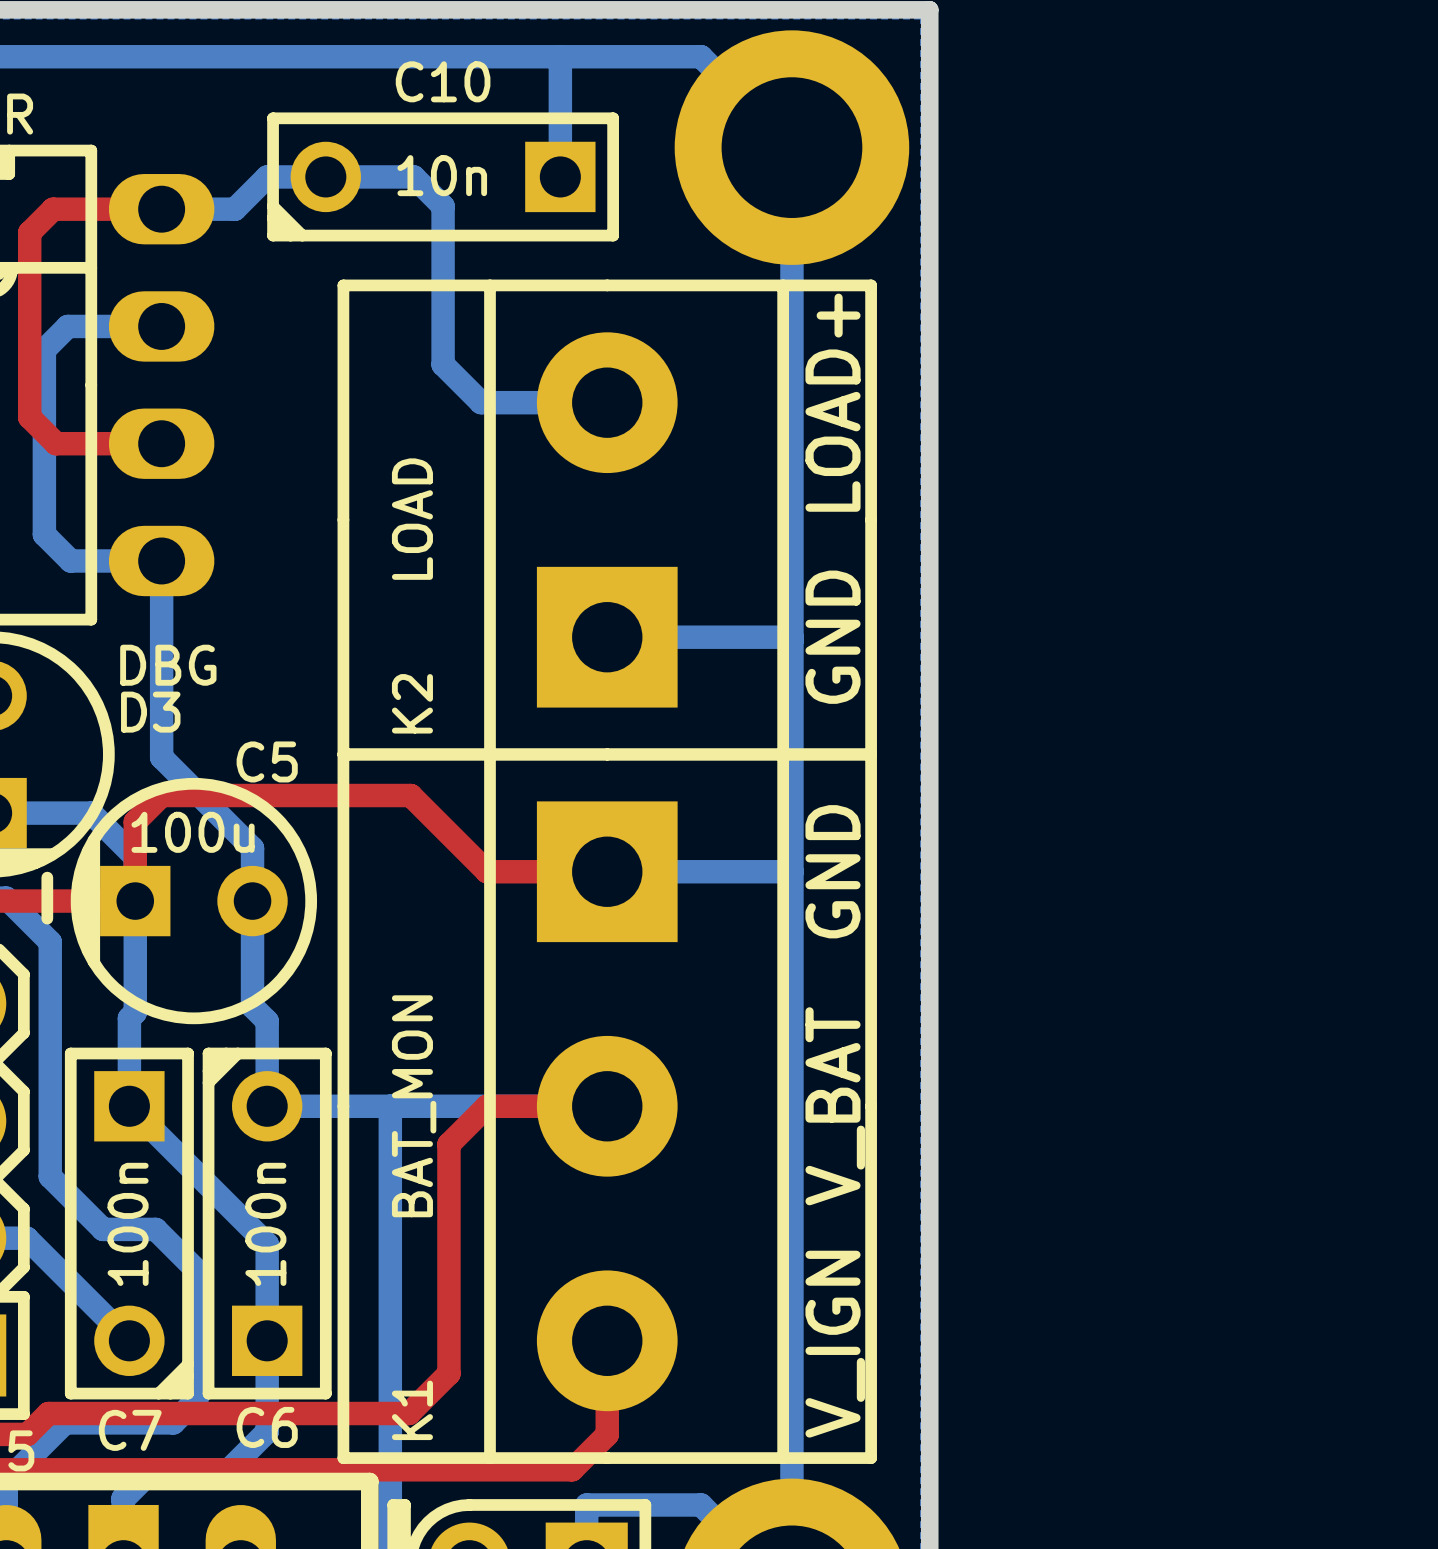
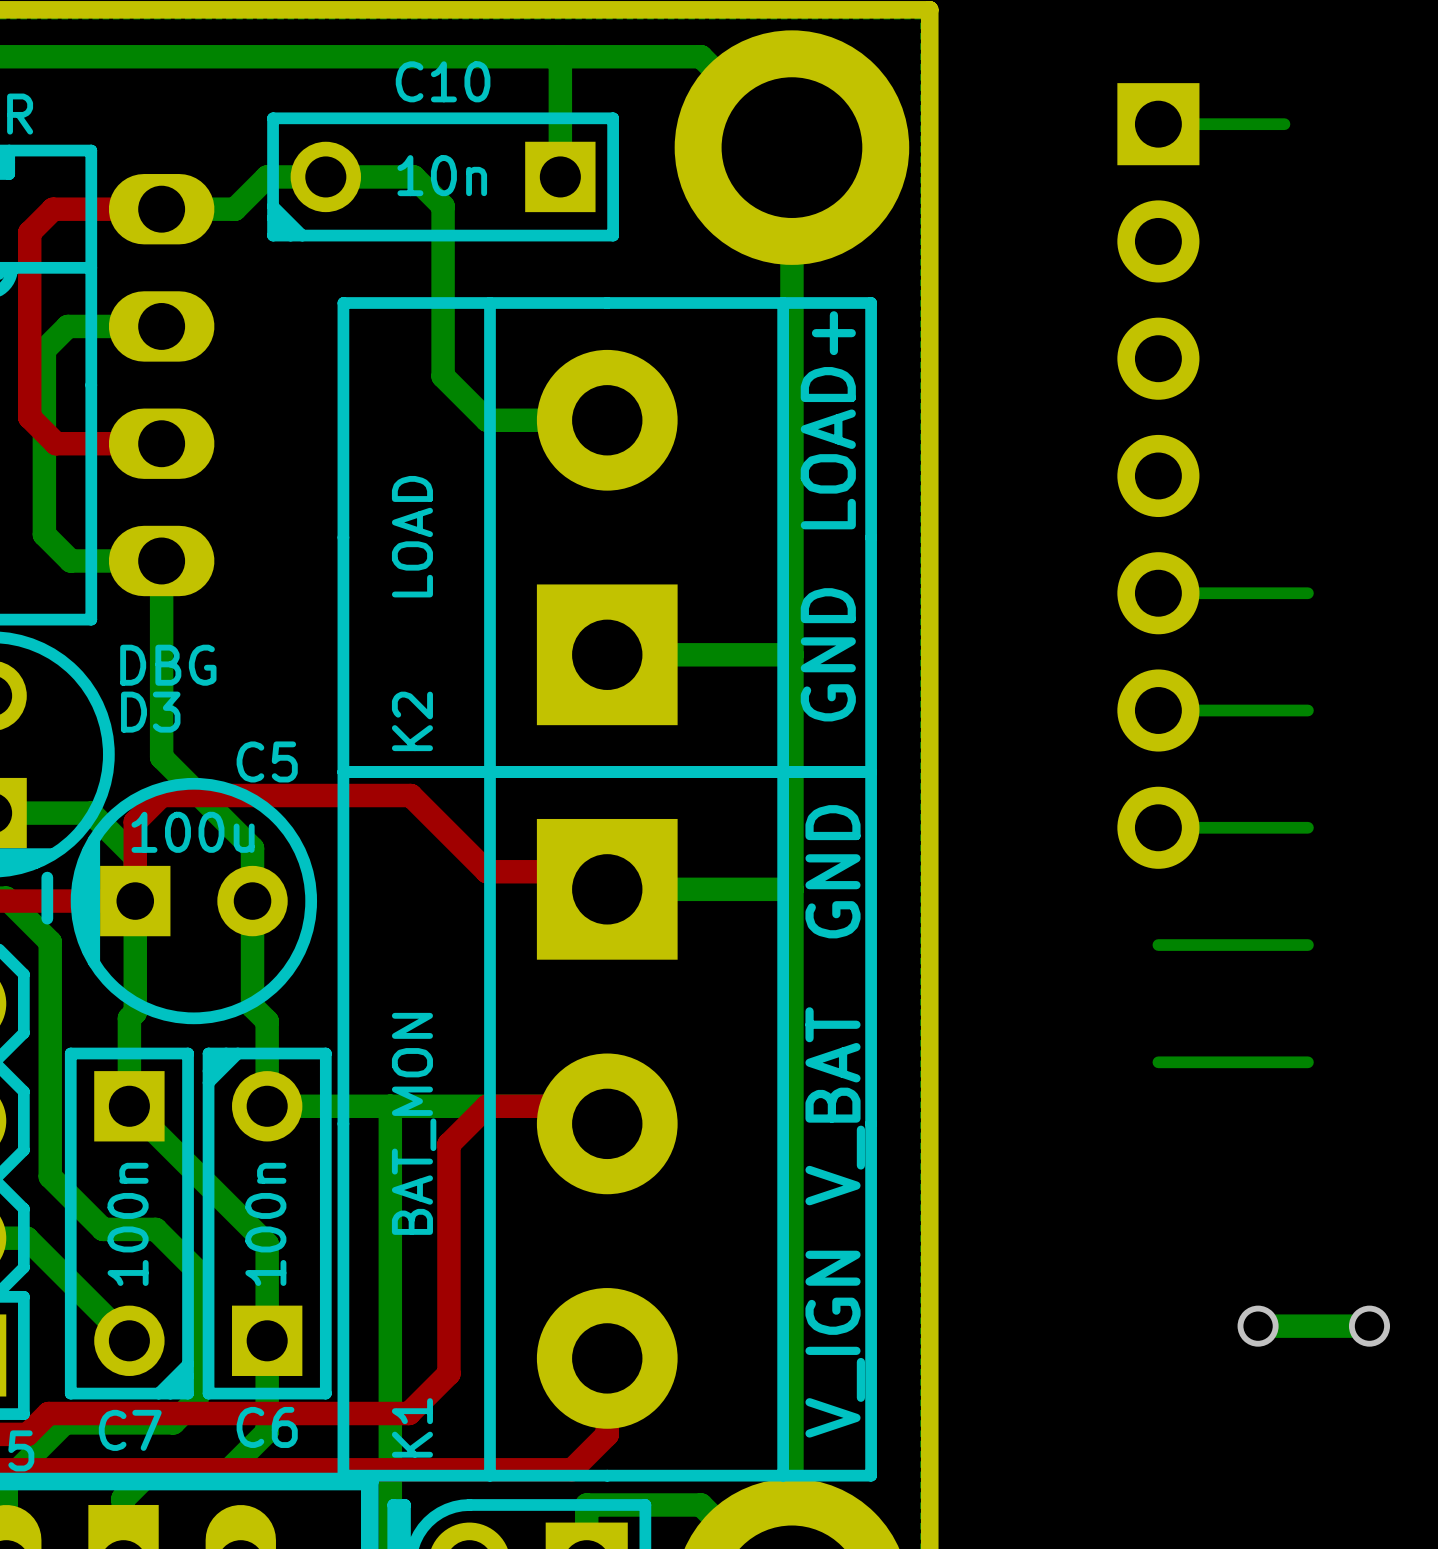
bottom track: none -> (1158, 124) (1284, 124)
bottom track: (443, 364) (481, 402) (607, 402) -> (443, 364) (443, 376) (487, 420) (607, 420)
text position: LOAD+ (833, 402) -> LOAD+ (828, 420)
part: none -> (1158, 475)
K2 position: (607, 519) -> (607, 537)
bottom track: none -> (1158, 593) (1307, 593)
bottom track: (607, 637) (791, 637) -> (607, 654) (791, 654)
text position: GND (833, 637) -> GND (828, 654)
bottom track: none -> (1158, 710) (1307, 710)
bottom track: none -> (1158, 827) (1307, 827)
bottom track: (607, 871) (791, 871) -> (607, 889) (791, 889)
bottom track: none -> (1158, 945) (1307, 945)
bottom track: none -> (1158, 1062) (1307, 1062)
K1 position: (607, 1106) -> (607, 1123)
bottom track: none -> (1258, 1326) (1369, 1326)
via: none -> (1258, 1326)
via: none -> (1369, 1326)

